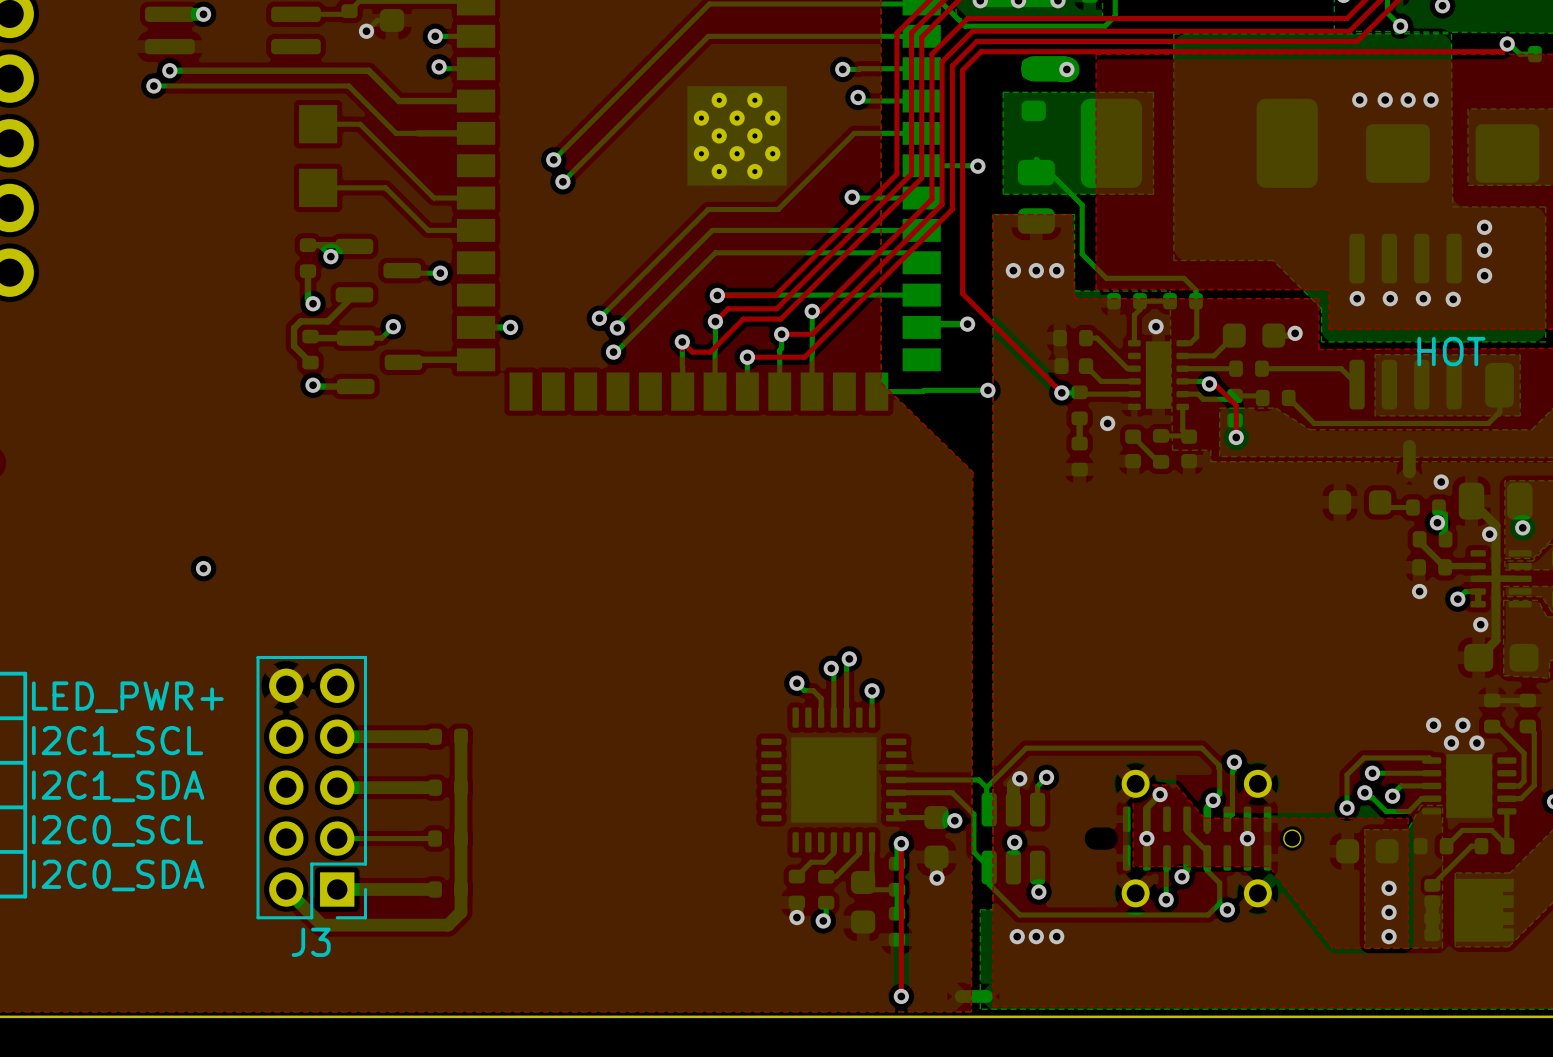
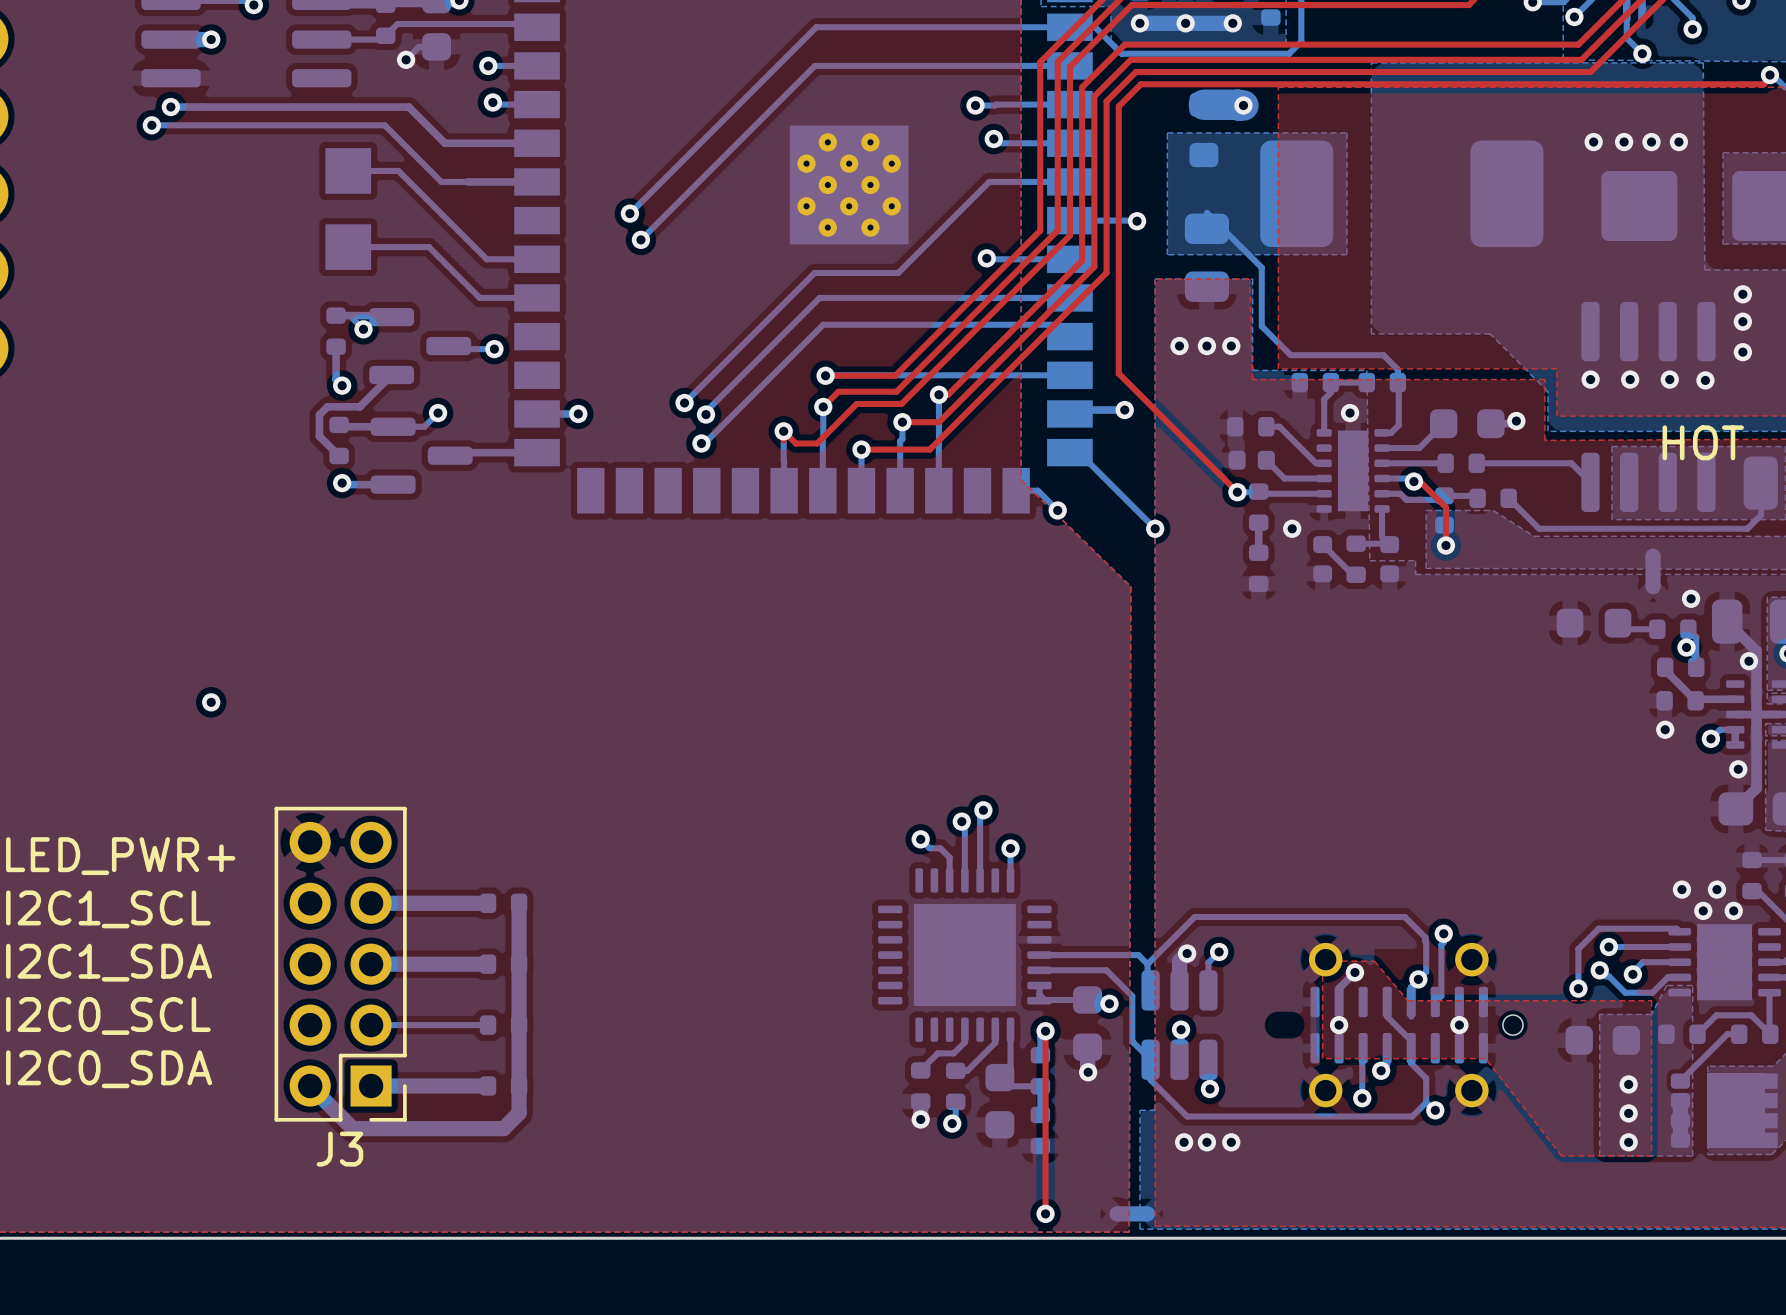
bottom track: none -> (1069, 452) (1079, 452) (1155, 528)
bottom track: (987, 390) (894, 391) -> (1057, 510) (1037, 490)
via position: (987, 390) -> (1155, 528)
via: none -> (1057, 510)

